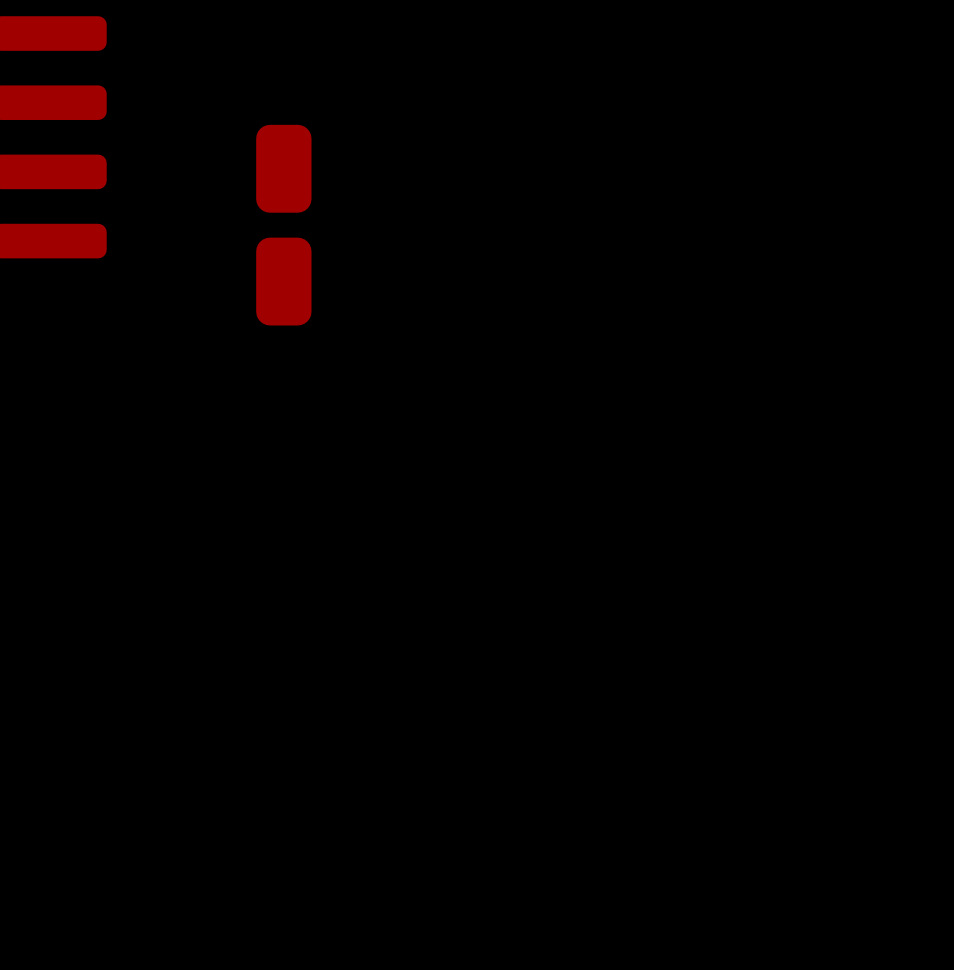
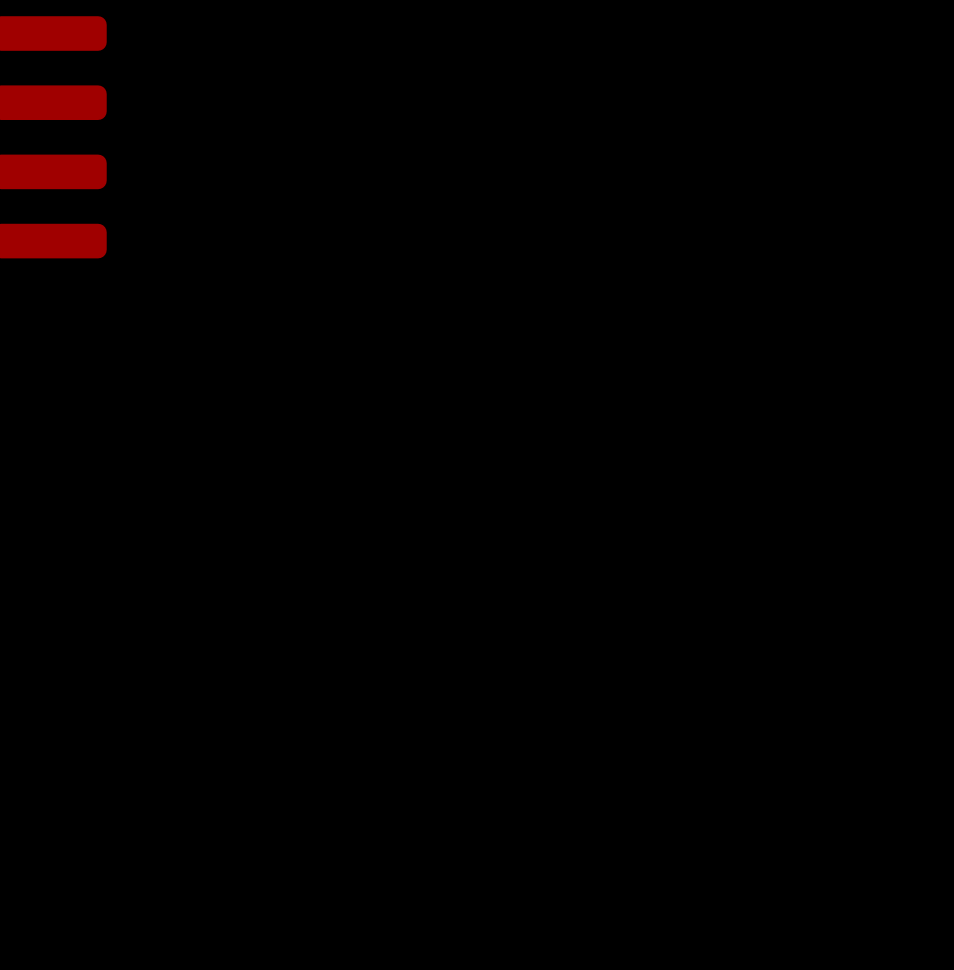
part: (283, 225) -> none

